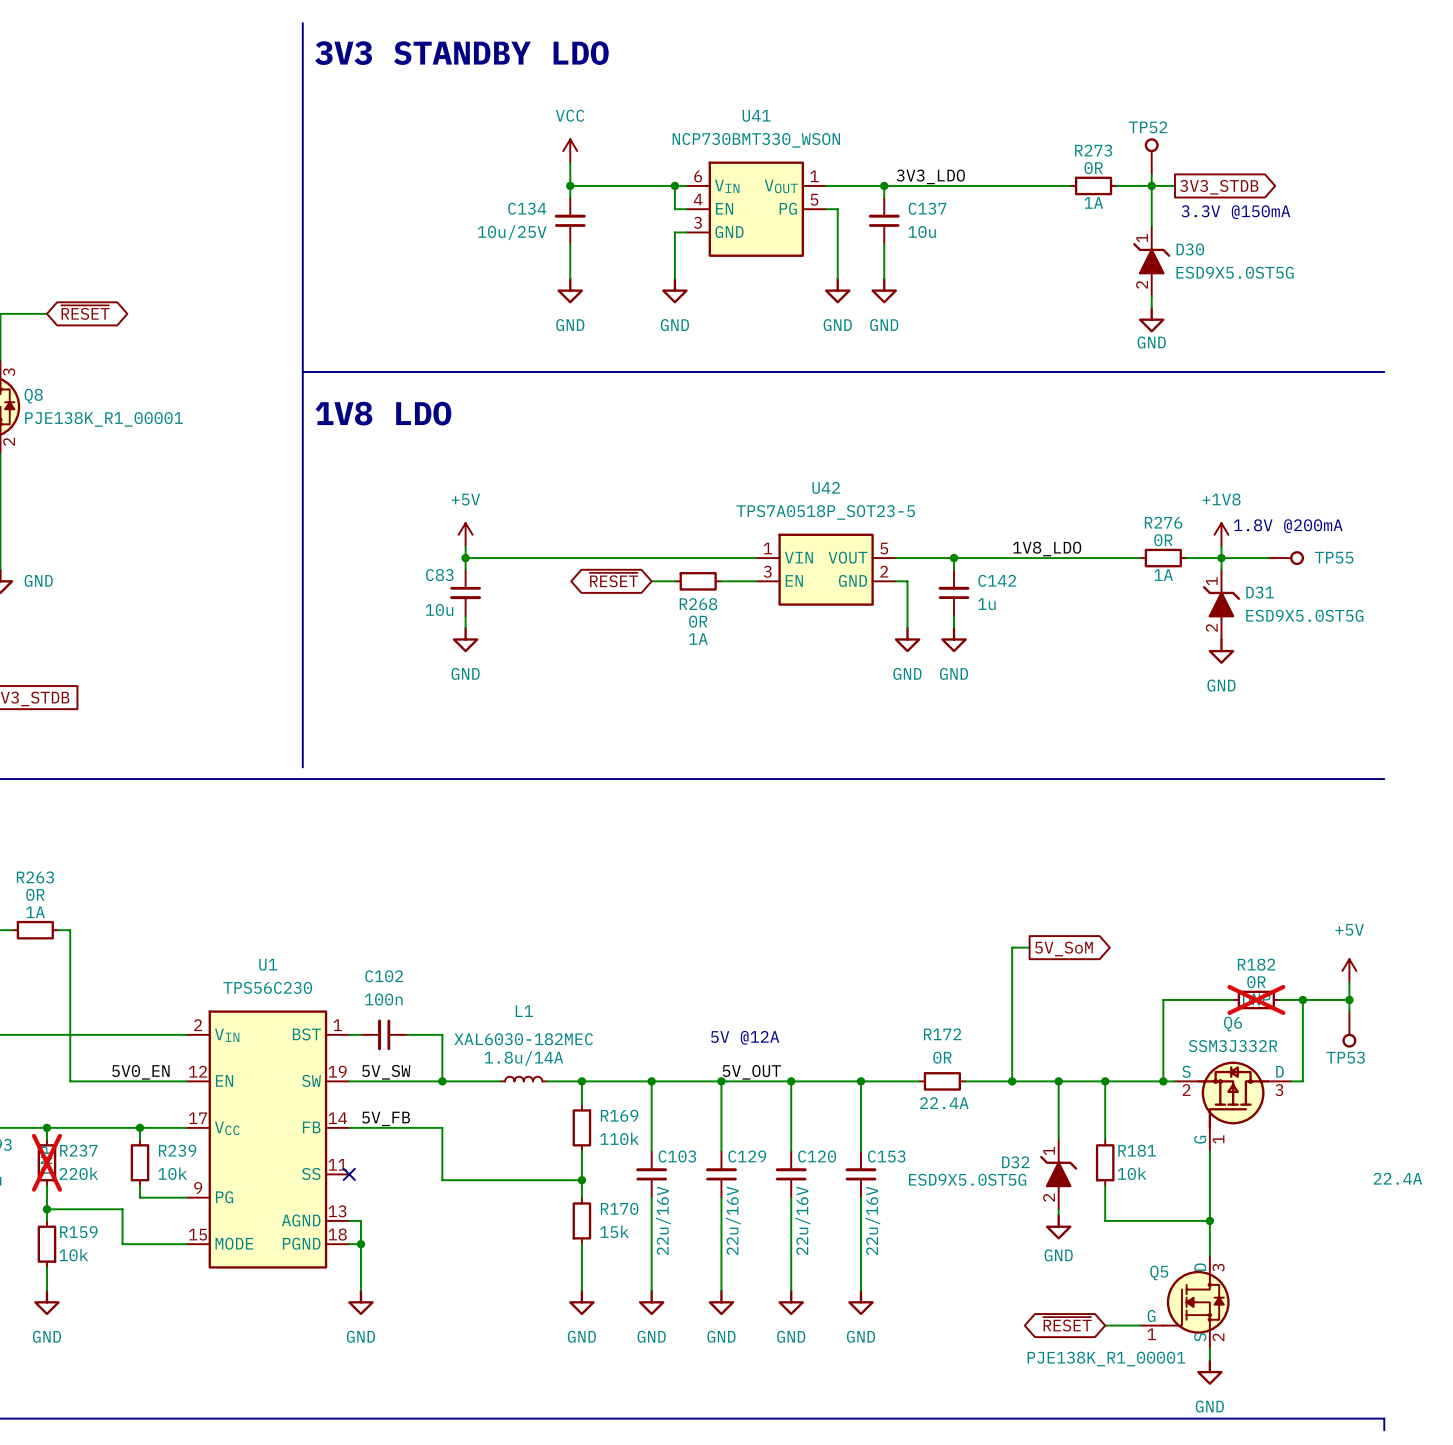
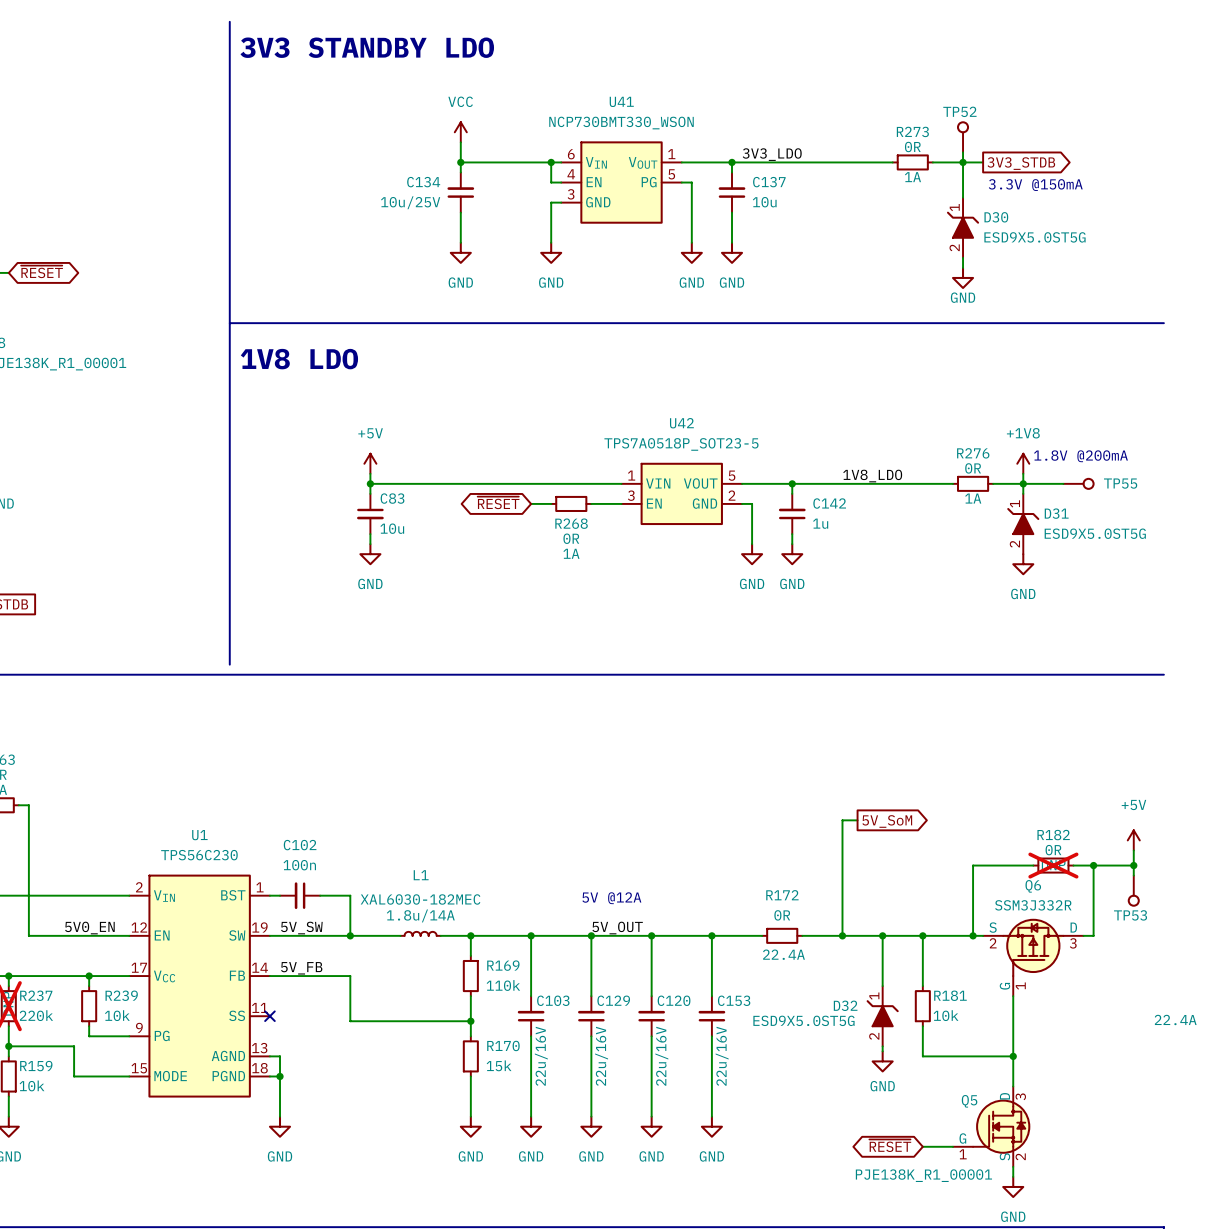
C83 name position: C83 (439, 575) -> C83 (392, 498)
C83 text position: 10u (439, 609) -> 10u (392, 528)

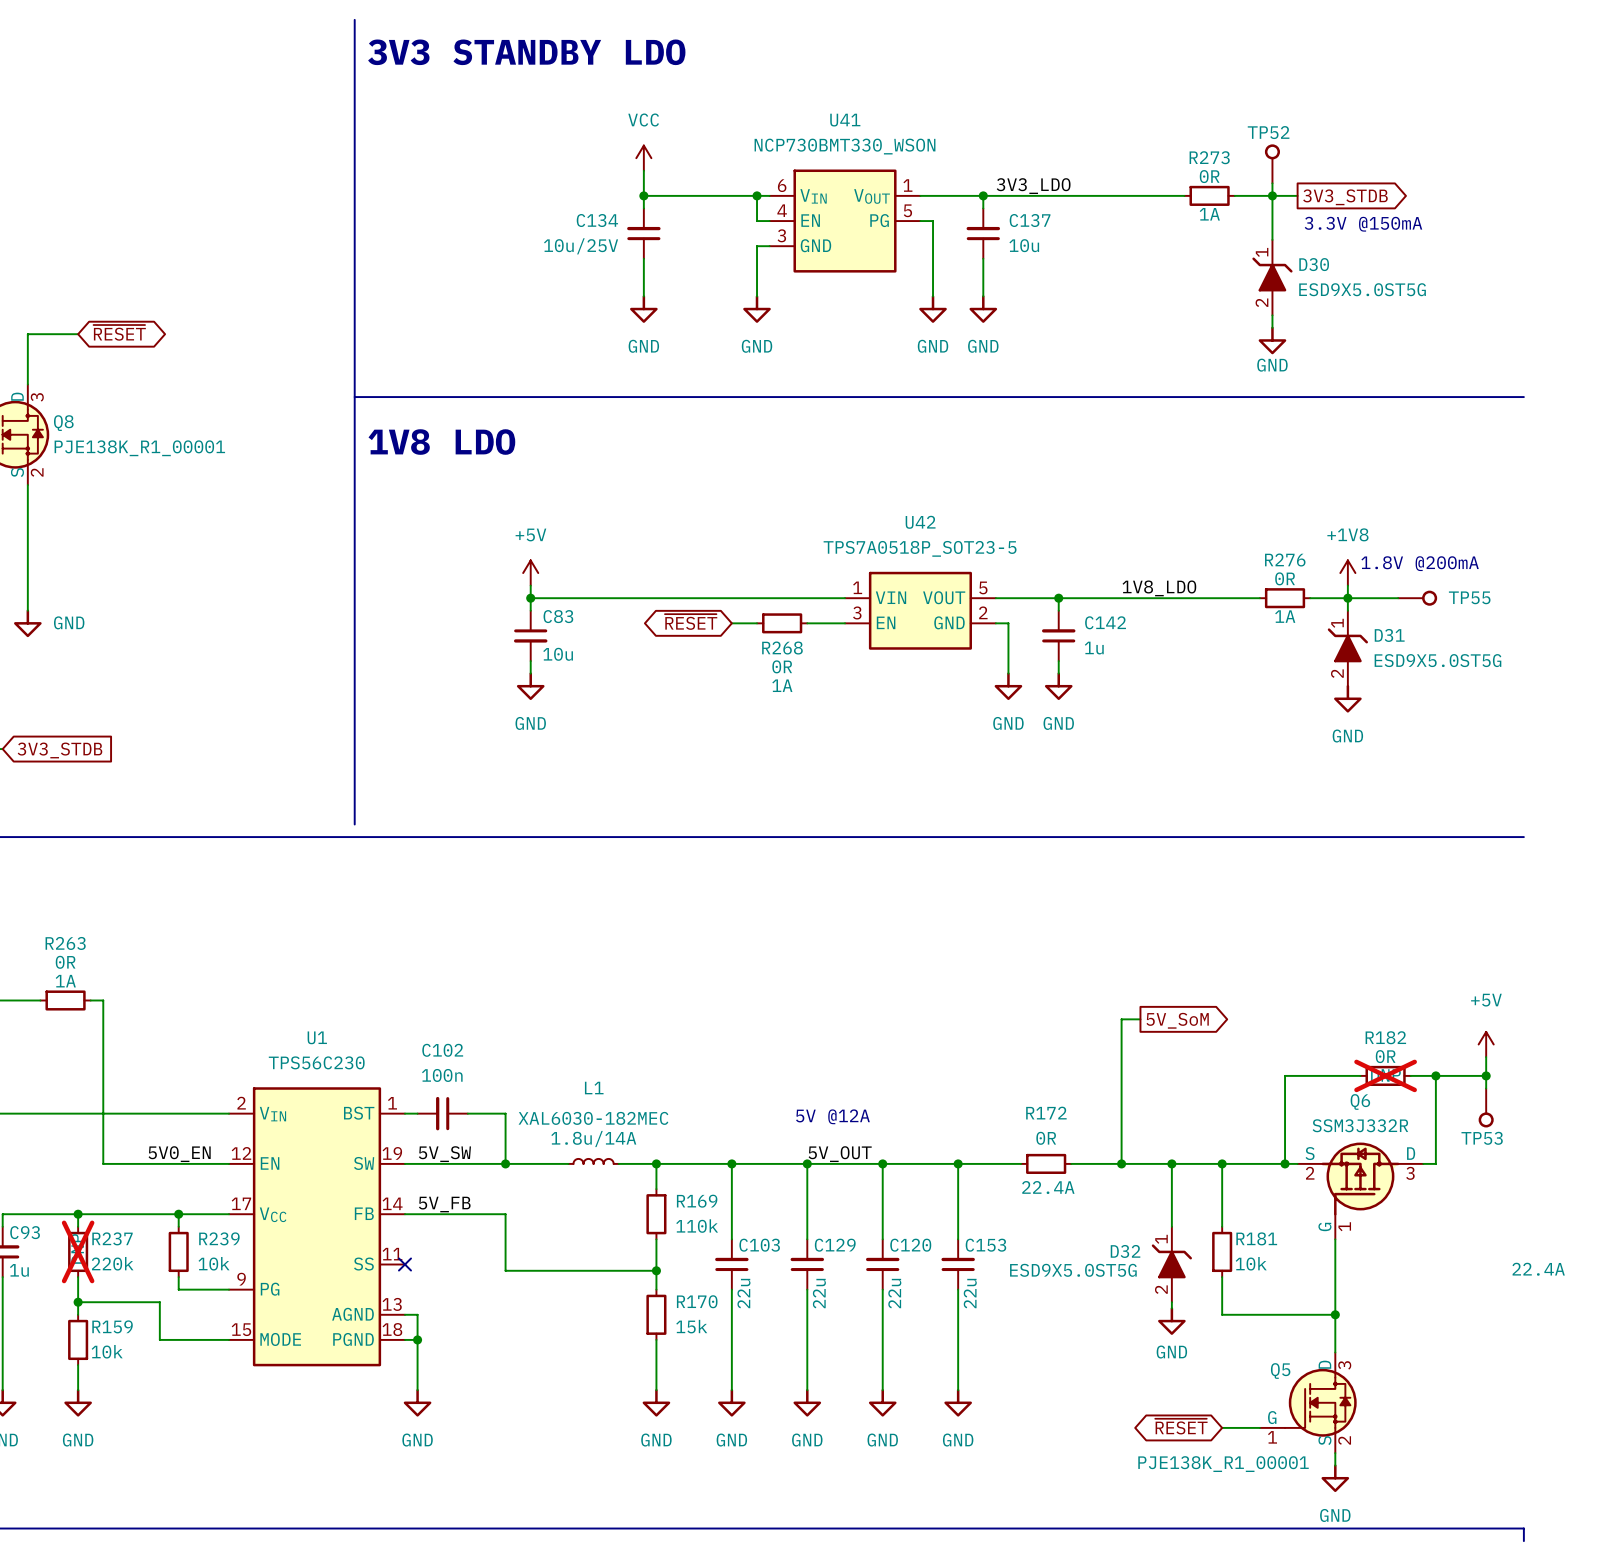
C103 text: 22u/16V (541, 1056) -> 22u (743, 1293)
C129 text: 22u/16V (601, 1056) -> 22u (819, 1293)
C120 text: 22u/16V (661, 1056) -> 22u (894, 1293)
C153 text: 22u/16V (722, 1056) -> 22u (970, 1293)

